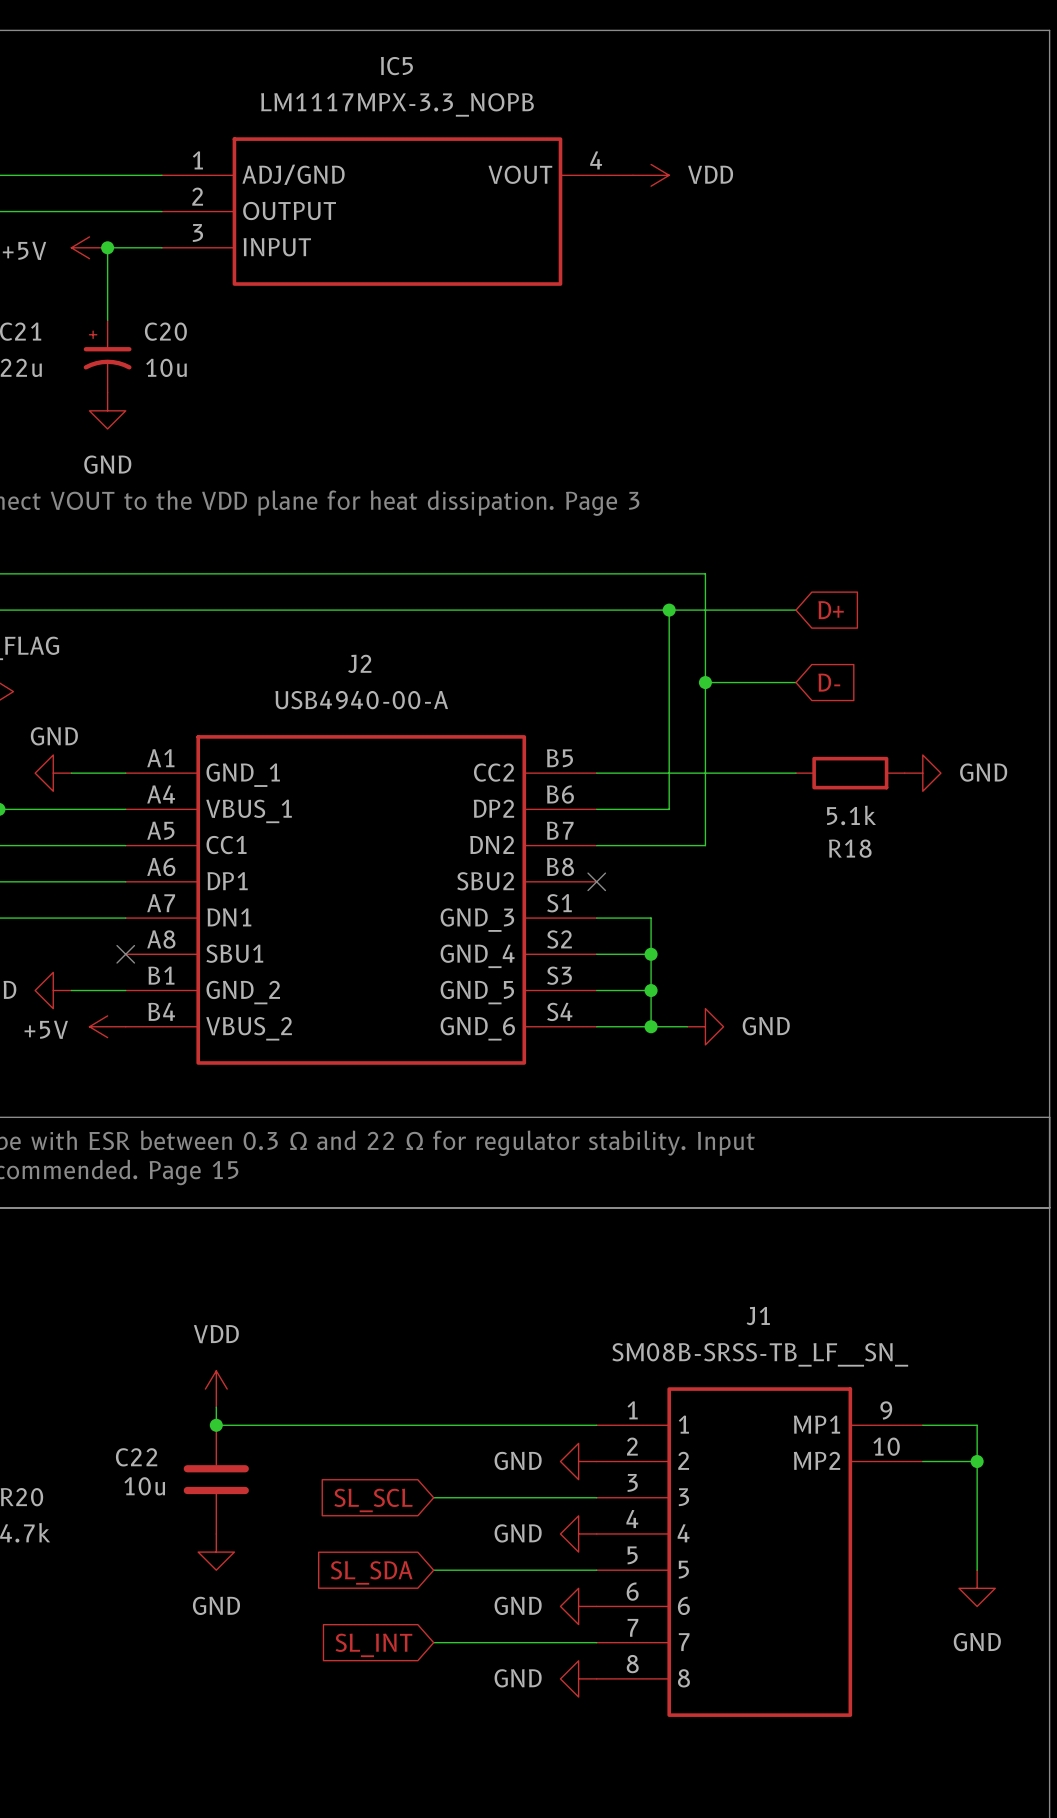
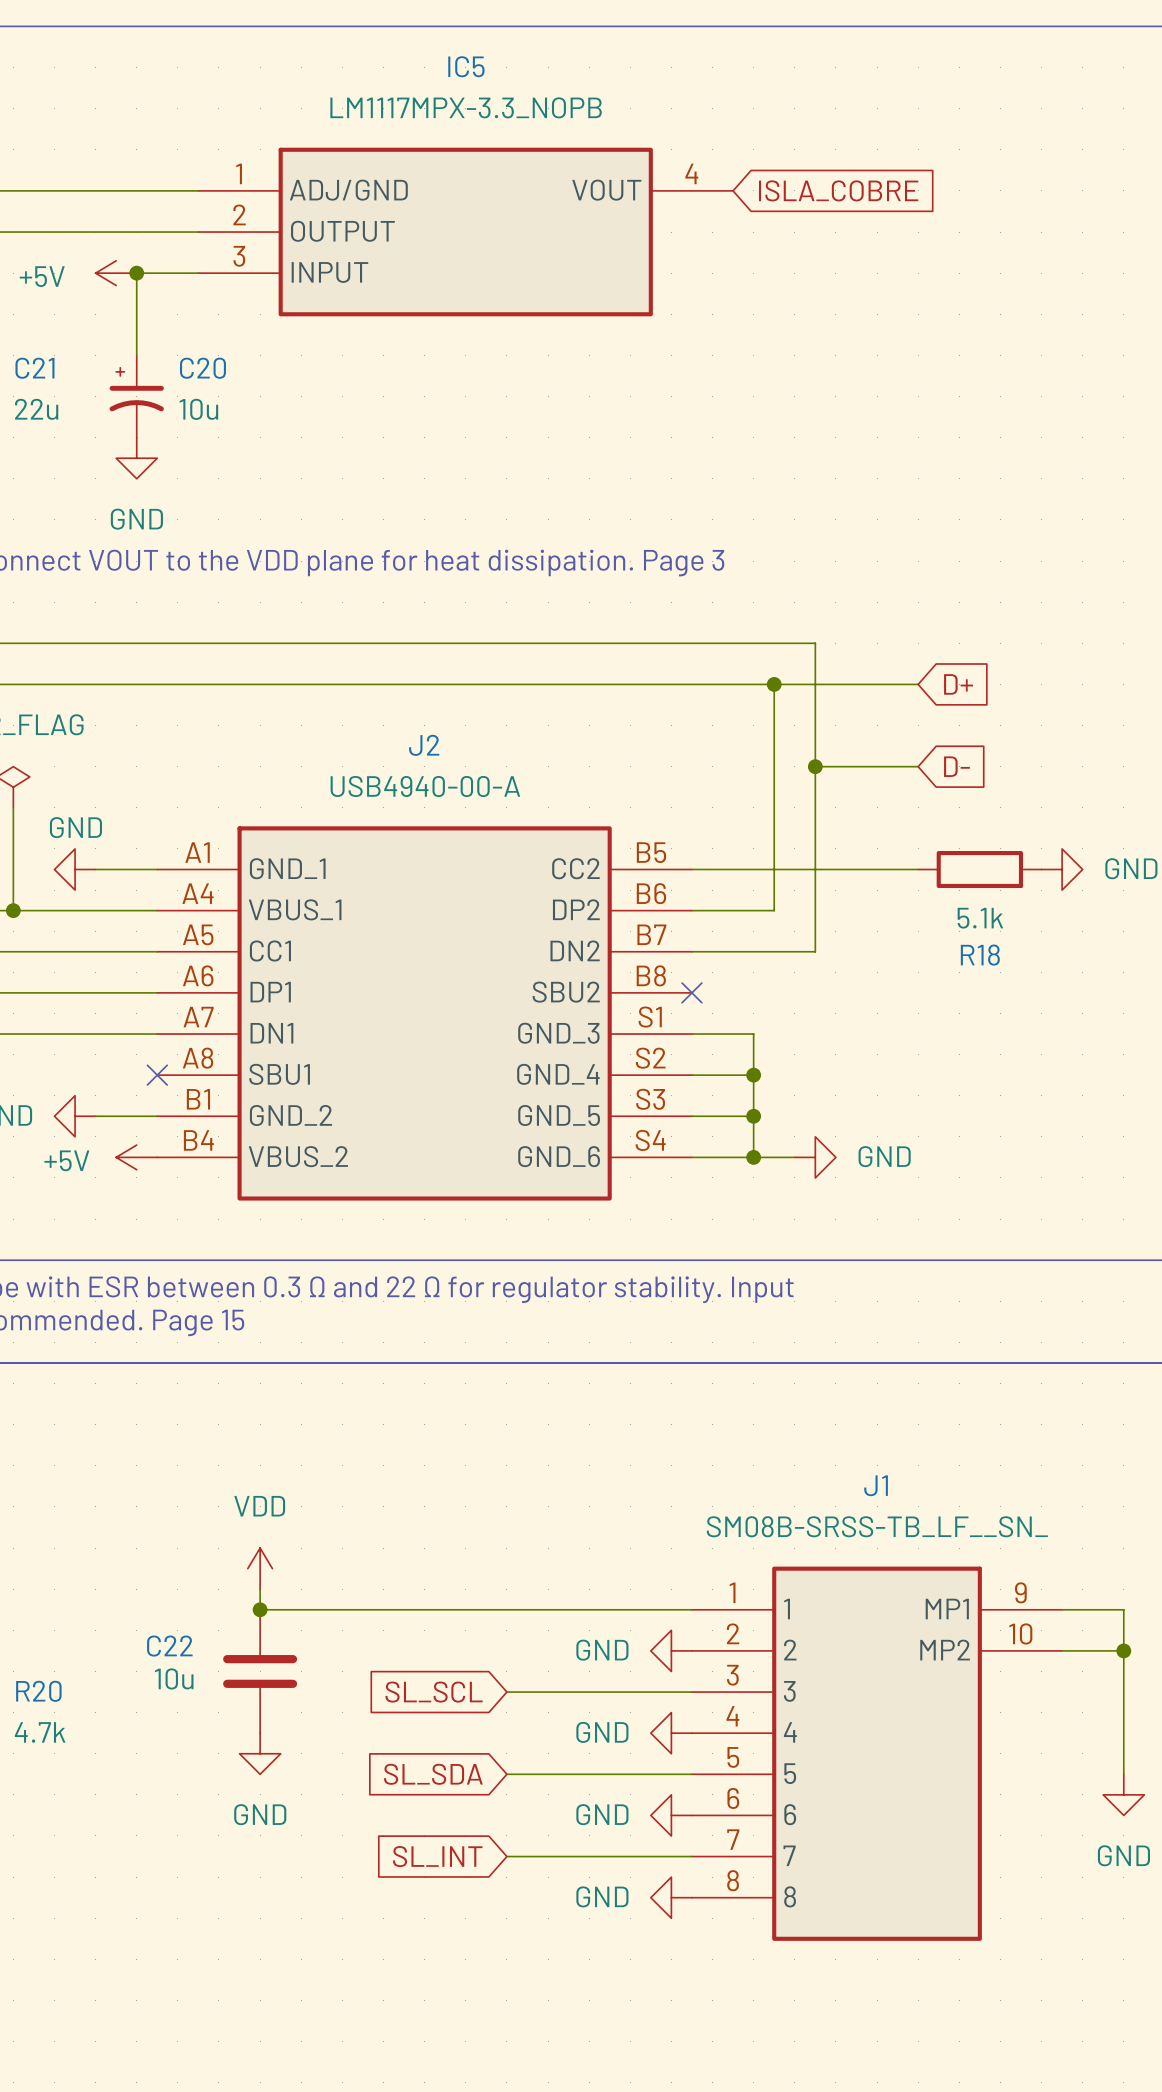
power symbol: VDD (651, 175) -> none
global label: none -> ISLA_COBRE (838, 190)

